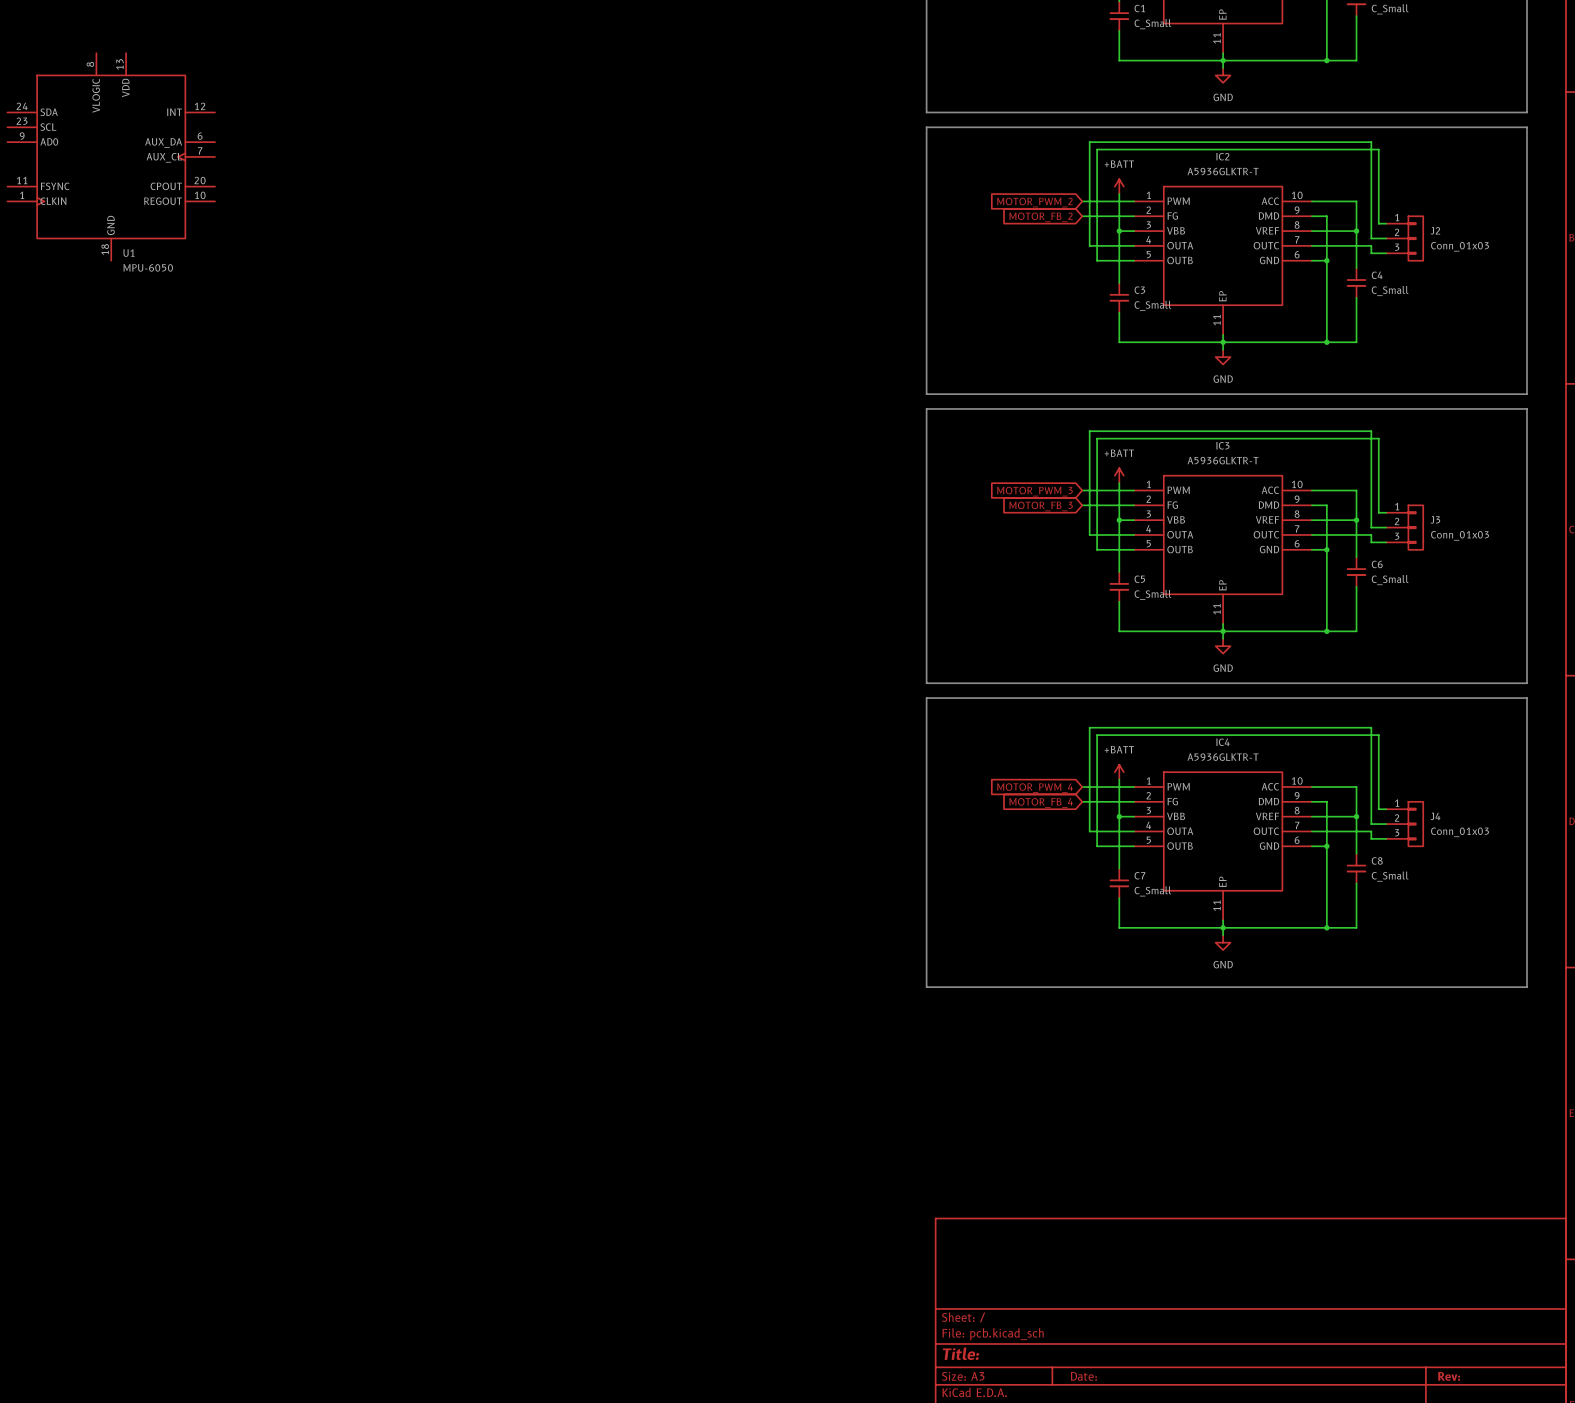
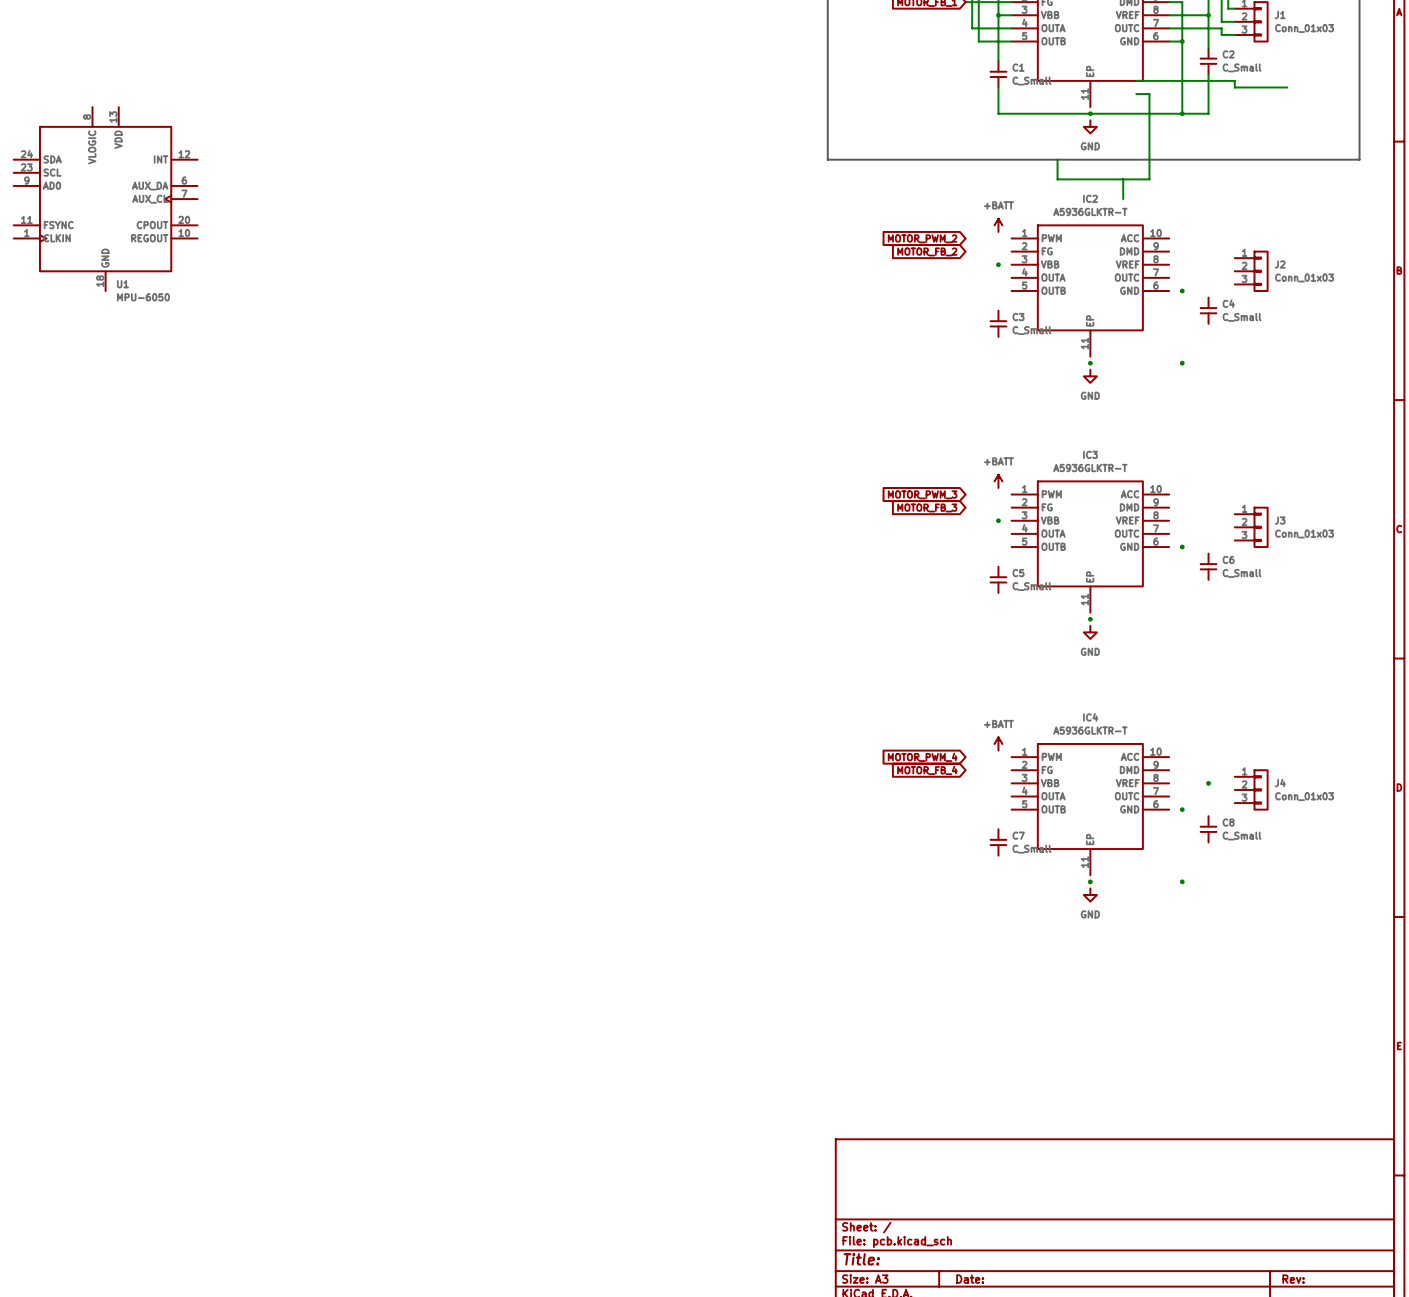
wire: none -> (1136, 80) (1234, 80) (1234, 87) (1287, 87)
wire: none -> (1136, 94) (1149, 94) (1149, 179) (1057, 179) (1057, 159)
wire: (1223, 53) (1223, 68) -> none
line: (926, 127) (926, 394) (1527, 394) (1527, 127) (926, 127) -> none
wire: none -> (1123, 179) (1123, 199)
wire: (1119, 194) (1119, 282) -> none
wire: (1082, 201) (1134, 201) -> none
wire: (1312, 201) (1356, 201) (1356, 268) -> none
wire: (1082, 216) (1134, 216) -> none
wire: (1312, 216) (1326, 216) (1326, 342) -> none
wire: (1386, 223) (1378, 223) (1378, 149) (1097, 149) (1097, 260) (1134, 260) -> none
wire: (1119, 231) (1134, 231) -> none
wire: (1312, 231) (1356, 231) -> none
junction: (1356, 231) -> none
wire: (1386, 238) (1371, 238) (1371, 142) (1089, 142) (1089, 245) (1134, 245) -> none
wire: (1312, 245) (1371, 245) (1371, 253) (1386, 253) -> none
wire: (1312, 260) (1326, 260) -> none
wire: (1356, 297) (1356, 342) (1119, 342) (1119, 312) -> none
wire: (1223, 334) (1223, 349) -> none
line: (926, 408) (1527, 408) (1527, 683) (926, 683) (926, 408) -> none
wire: (1119, 483) (1119, 572) -> none
wire: (1082, 490) (1134, 490) -> none
wire: (1312, 490) (1356, 490) (1356, 557) -> none
wire: (1082, 505) (1134, 505) -> none
wire: (1312, 505) (1326, 505) (1326, 631) -> none
wire: (1386, 512) (1378, 512) (1378, 438) (1097, 438) (1097, 549) (1134, 549) -> none
wire: (1119, 520) (1134, 520) -> none
wire: (1312, 520) (1356, 520) -> none
junction: (1356, 520) -> none
wire: (1386, 527) (1371, 527) (1371, 431) (1089, 431) (1089, 534) (1134, 534) -> none
wire: (1312, 534) (1371, 534) (1371, 542) (1386, 542) -> none
wire: (1312, 549) (1326, 549) -> none
wire: (1356, 586) (1356, 631) (1119, 631) (1119, 601) -> none
wire: (1223, 623) (1223, 638) -> none
junction: (1326, 631) -> none
line: (926, 698) (926, 987) (1527, 987) (1527, 698) (926, 698) -> none
wire: (1119, 779) (1119, 868) -> none
wire: (1082, 787) (1134, 787) -> none
wire: (1312, 787) (1356, 787) (1356, 853) -> none
wire: (1082, 801) (1134, 801) -> none
wire: (1312, 801) (1326, 801) (1326, 927) -> none
wire: (1386, 809) (1378, 809) (1378, 735) (1097, 735) (1097, 846) (1134, 846) -> none
wire: (1119, 816) (1134, 816) -> none
junction: (1119, 816) -> none
wire: (1312, 816) (1356, 816) -> none
wire: (1386, 824) (1371, 824) (1371, 727) (1089, 727) (1089, 831) (1134, 831) -> none
wire: (1312, 831) (1371, 831) (1371, 838) (1386, 838) -> none
wire: (1312, 846) (1326, 846) -> none
wire: (1356, 883) (1356, 927) (1119, 927) (1119, 898) -> none
wire: (1223, 920) (1223, 935) -> none

